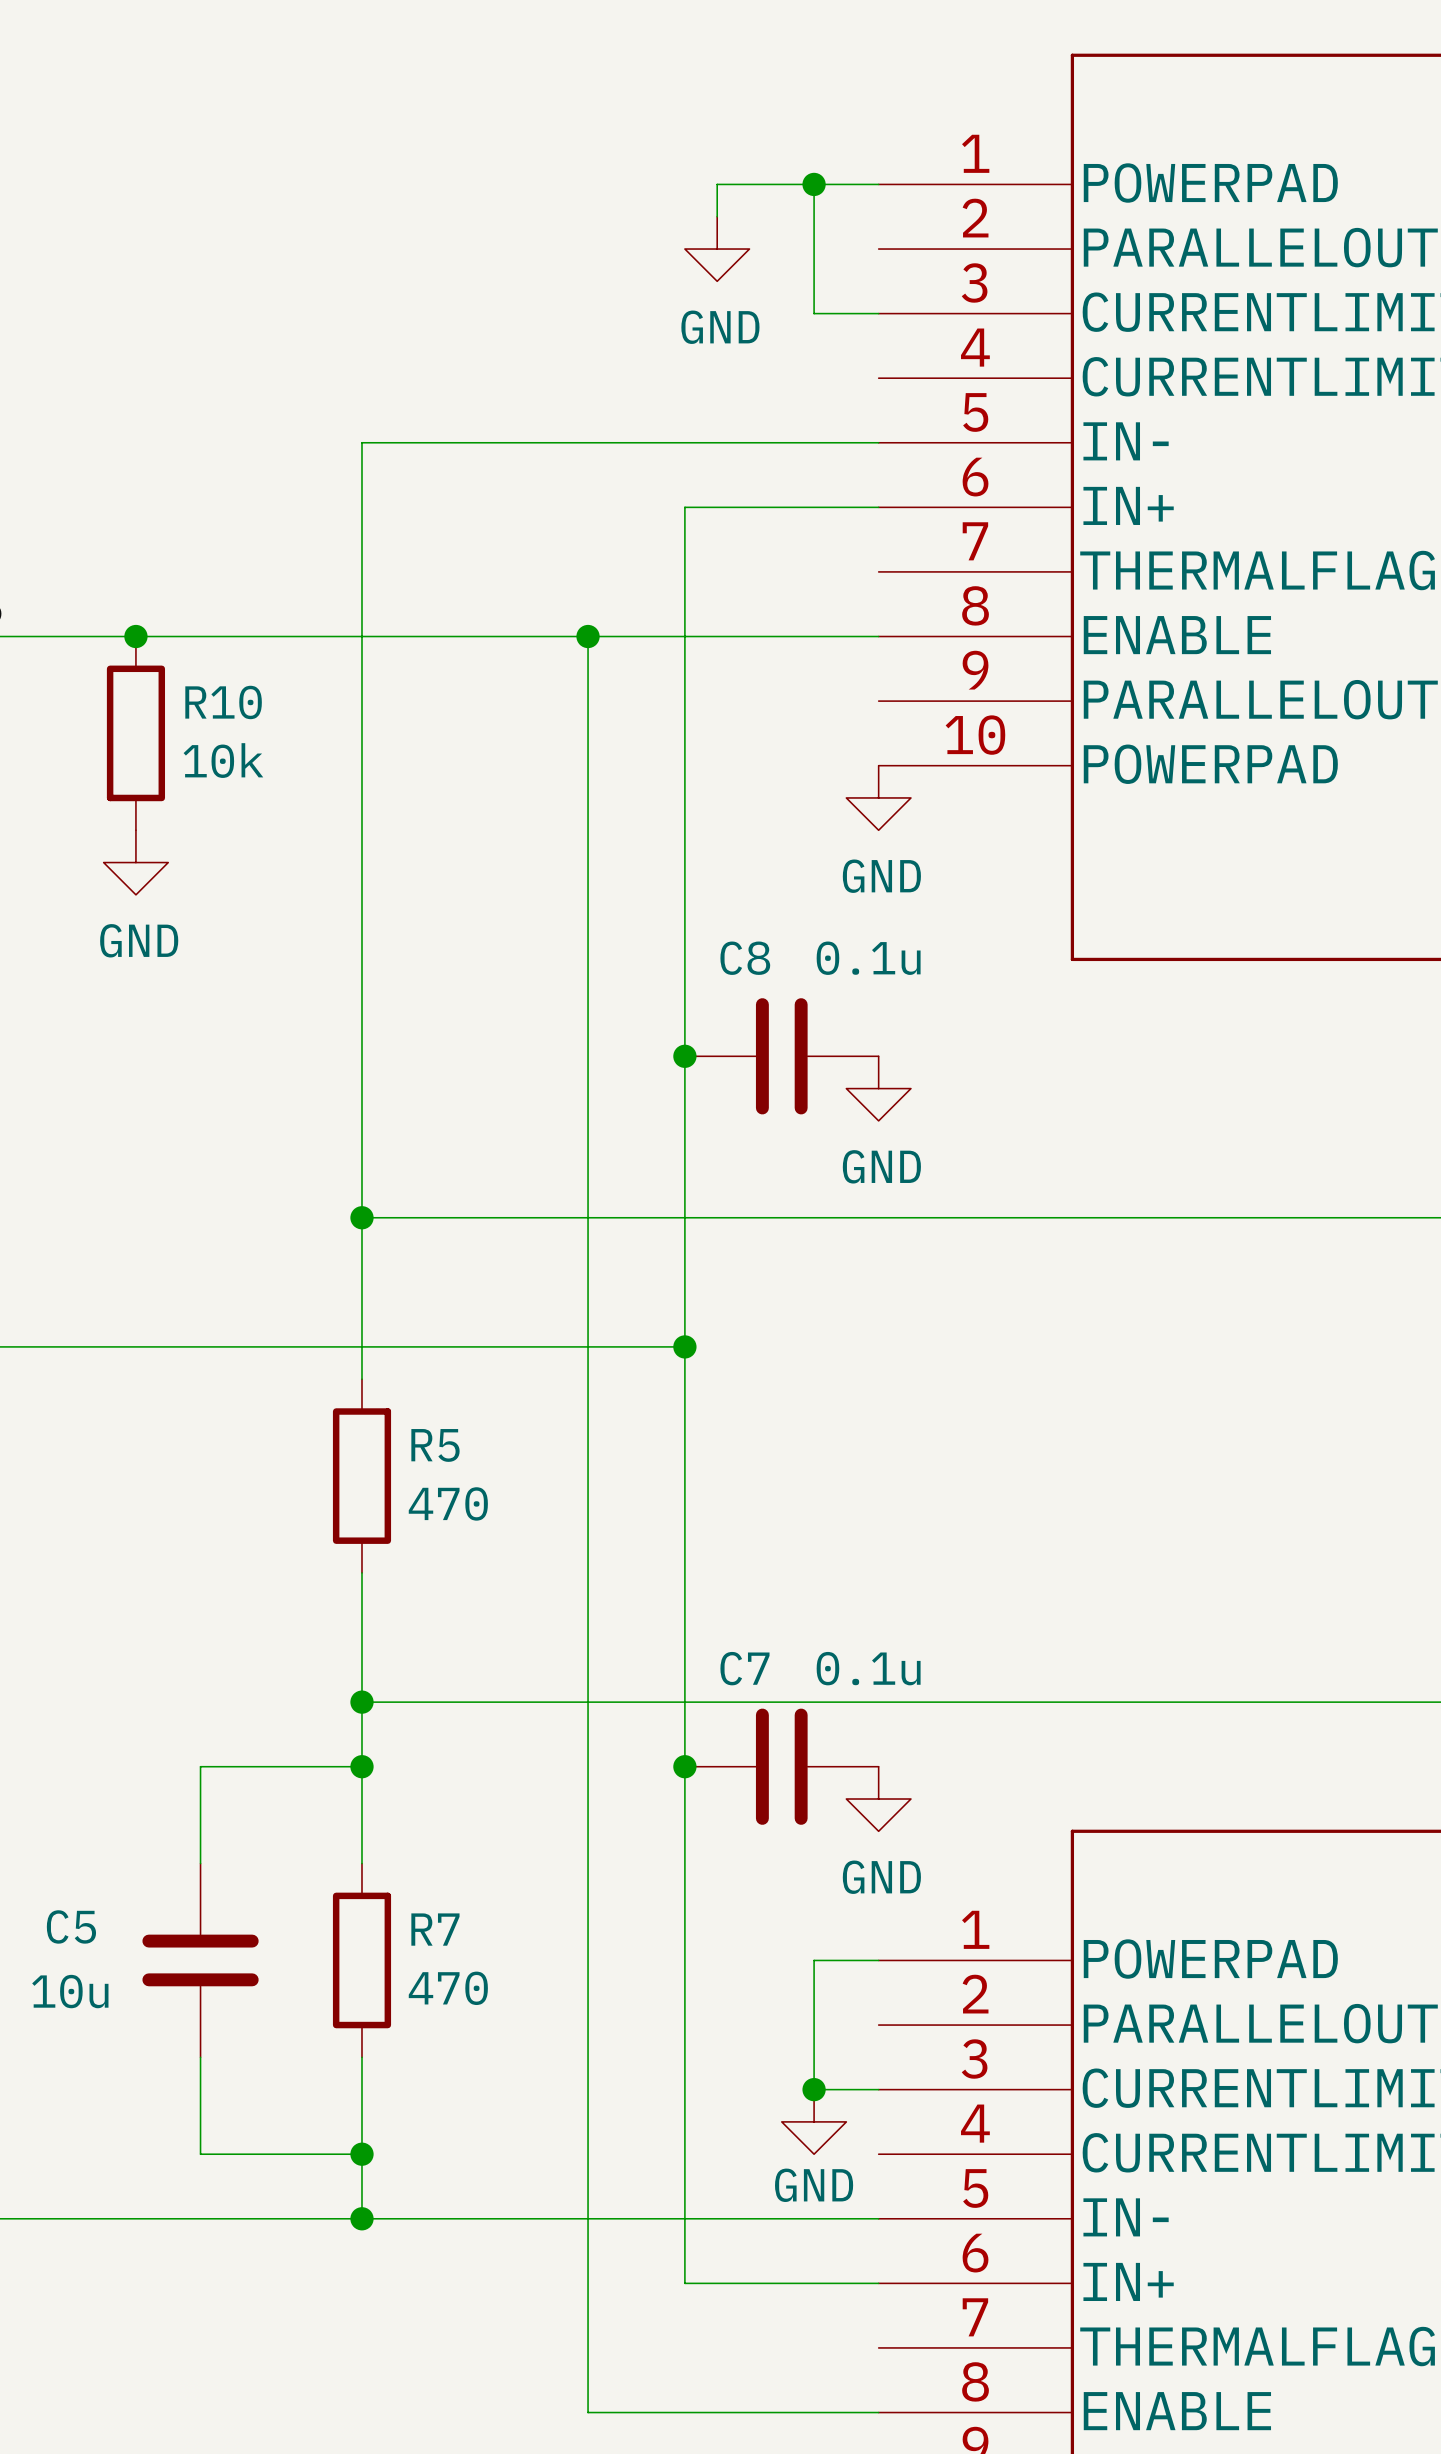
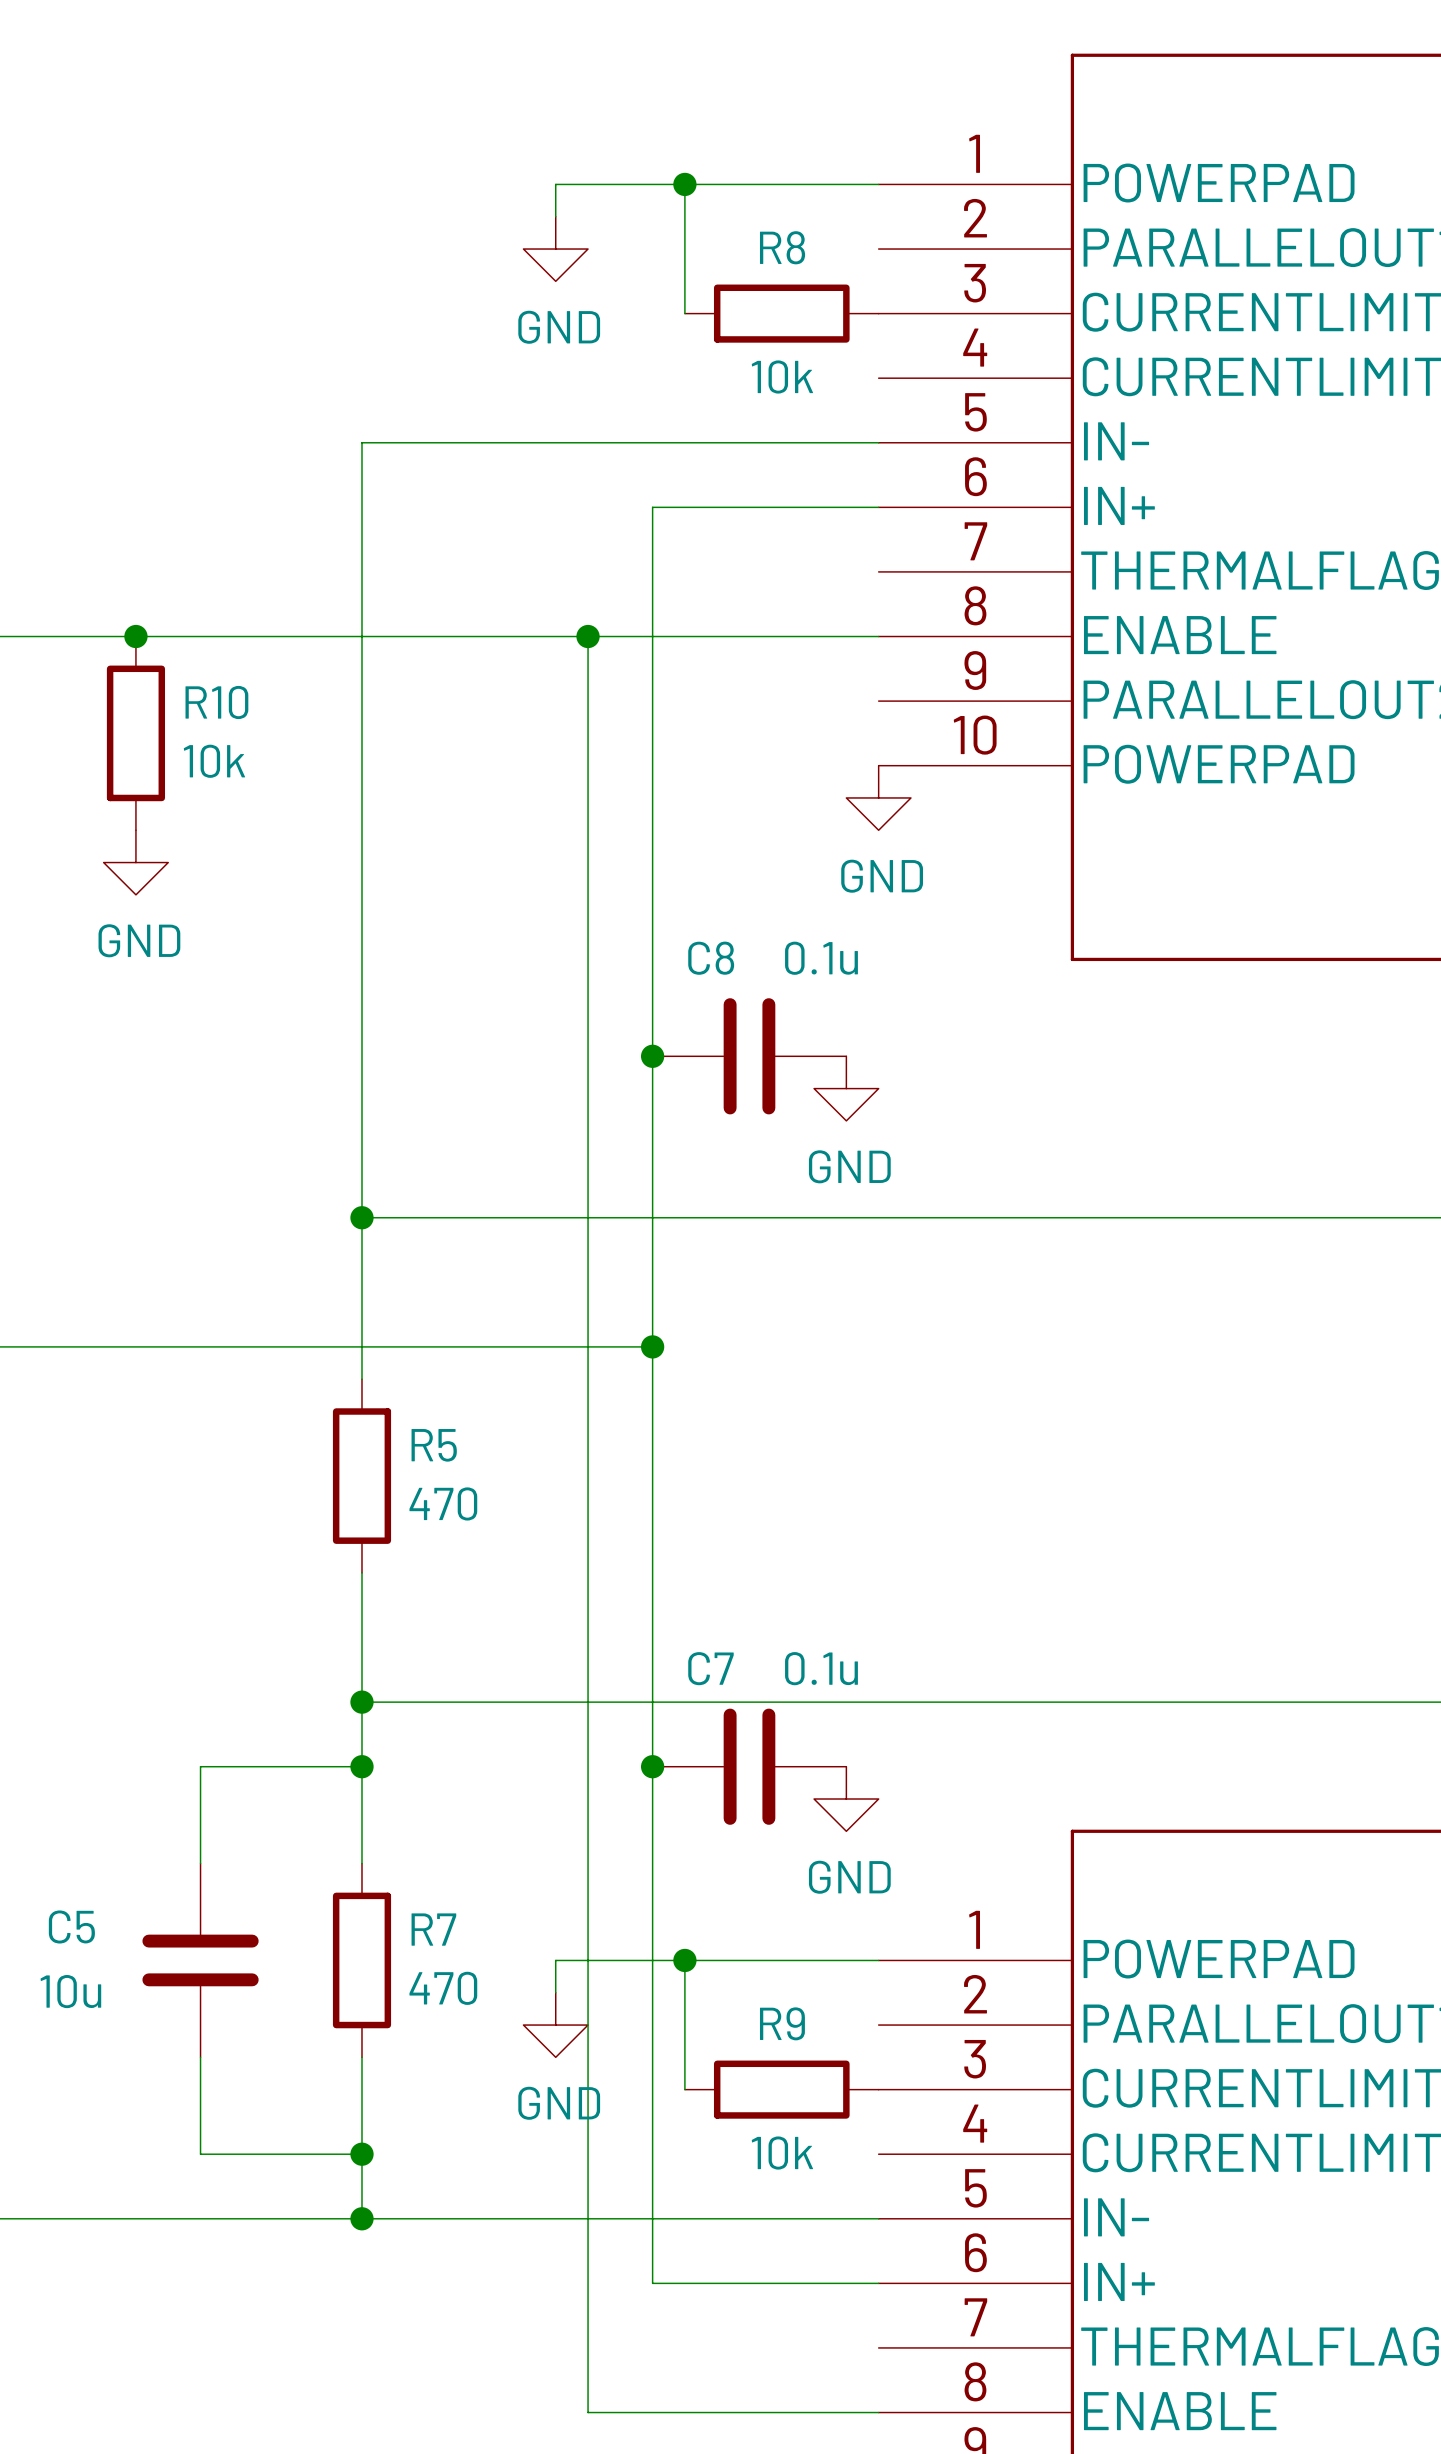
wire: none -> (684, 184) (684, 313)
wire: (717, 184) (717, 216) -> (717, 184) (555, 184) (555, 216)
wire: (814, 184) (814, 313) (878, 313) -> none
junction position: (814, 184) -> (684, 184)
power symbol position: GND (717, 249) -> GND (555, 249)
R8: none -> 10k (781, 313)
wire: (684, 507) (684, 1960) -> (684, 507) (652, 507) (652, 2283) (684, 2283)
junction position: (684, 1056) -> (652, 1056)
C8 position: (781, 1056) -> (749, 1056)
power symbol position: GND (878, 1088) -> GND (846, 1088)
wire: (652, 1346) (684, 1346) -> none
junction position: (684, 1346) -> (652, 1346)
junction position: (684, 1766) -> (652, 1766)
C7 position: (781, 1766) -> (749, 1766)
power symbol position: GND (878, 1799) -> GND (846, 1799)
junction: none -> (684, 1960)
wire: (814, 1960) (814, 2089) (878, 2089) -> (814, 1960) (555, 1960) (555, 1992)
power symbol: none -> GND (555, 2025)
wire: (684, 2089) (684, 2283) -> none
R9: none -> 10k (781, 2089)
junction: (814, 2089) -> none
power symbol: GND (814, 2121) -> none

